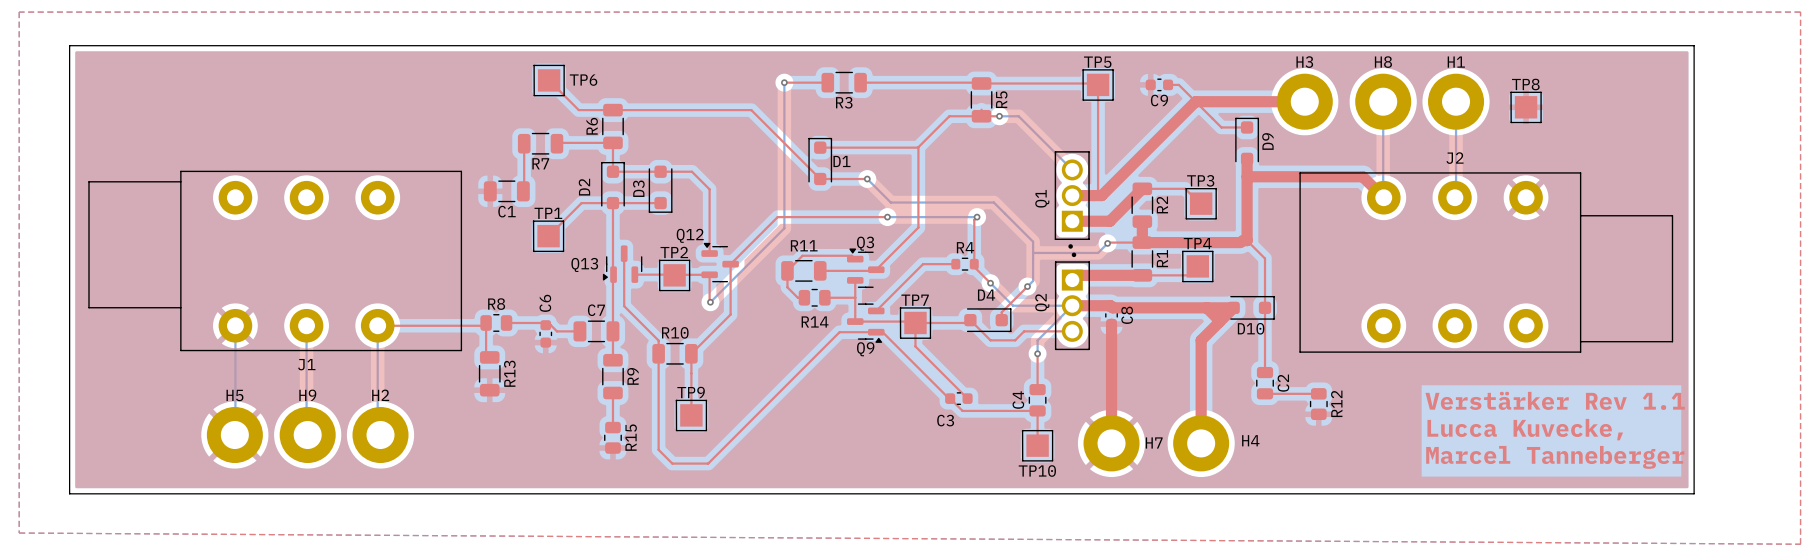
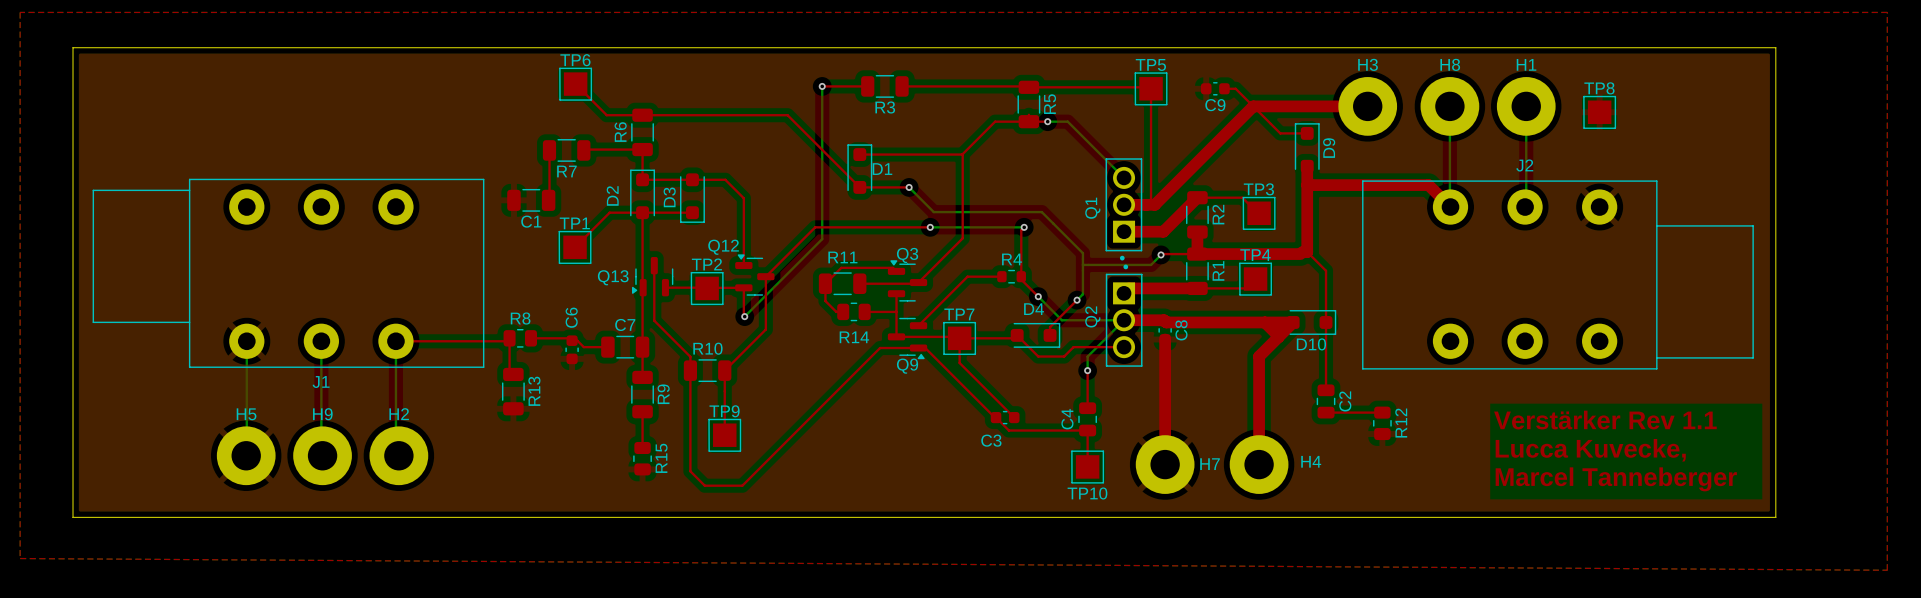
TP6 name position: TP6 (583, 80) -> TP6 (575, 60)

